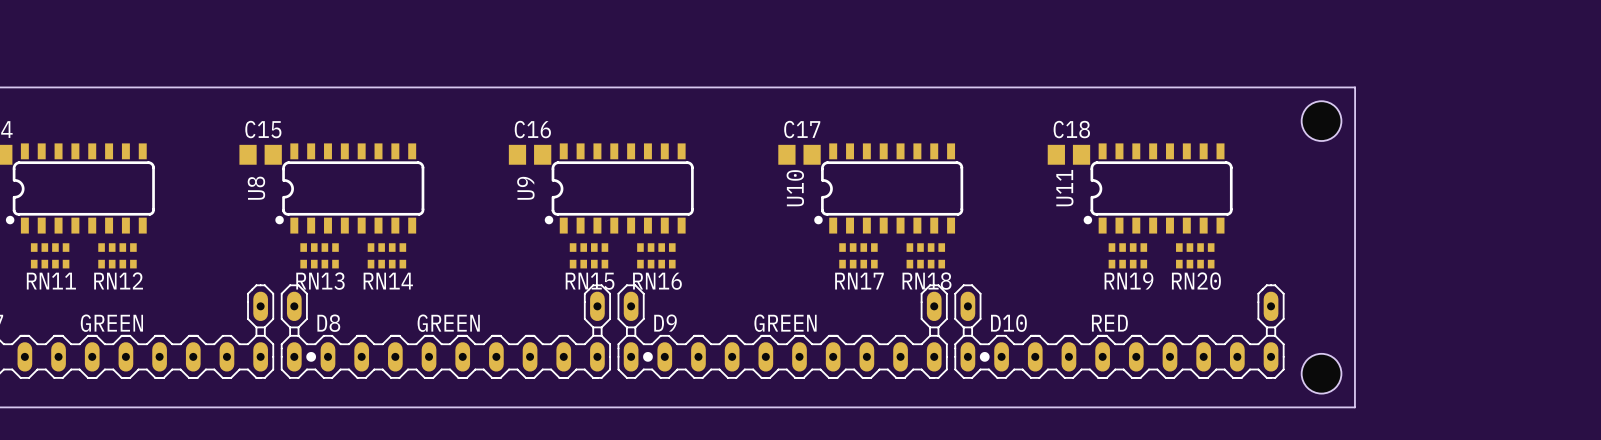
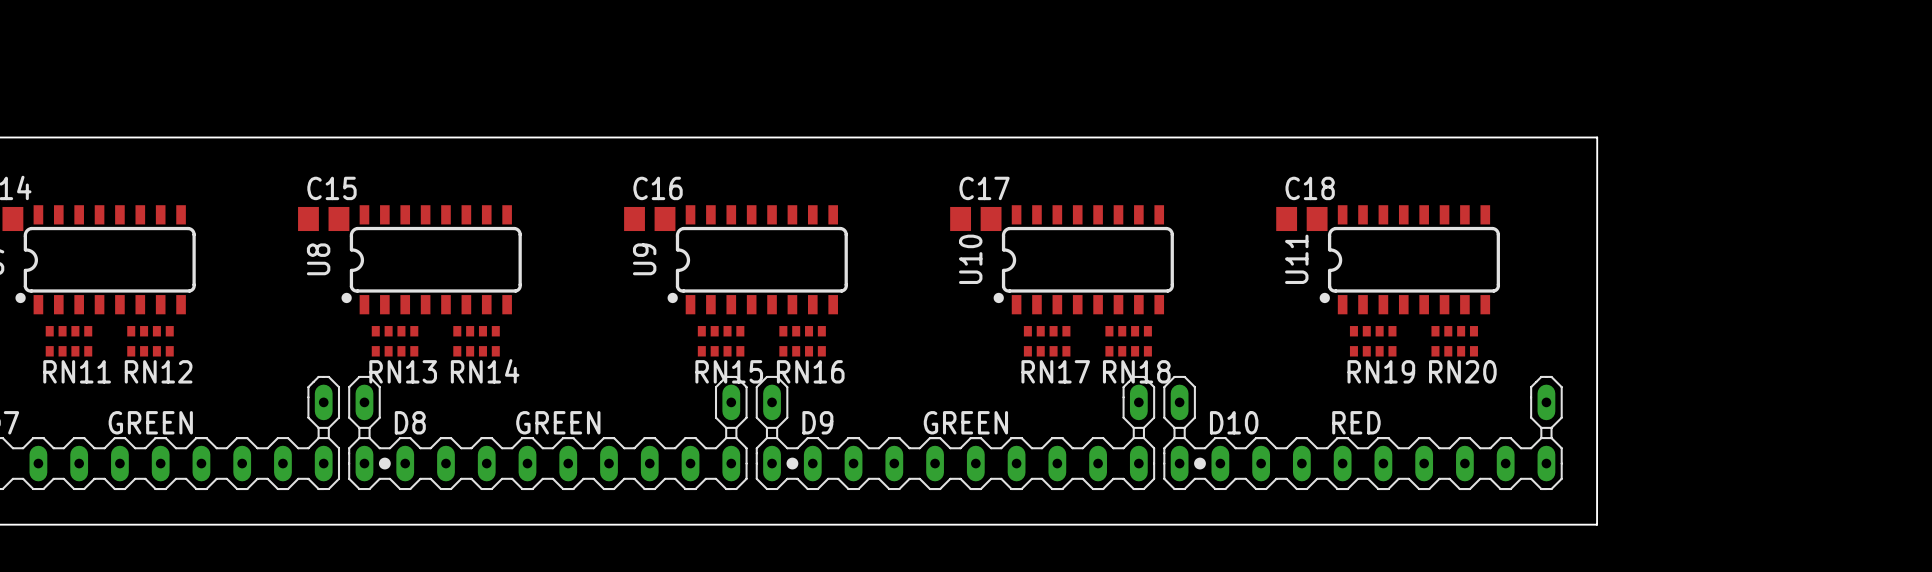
board edge: (1312, 87) (1355, 87) (1354, 407) (1312, 407) -> (1597, 137) (1597, 524)
hole: (1321, 121) -> none
hole: (1321, 373) -> none

